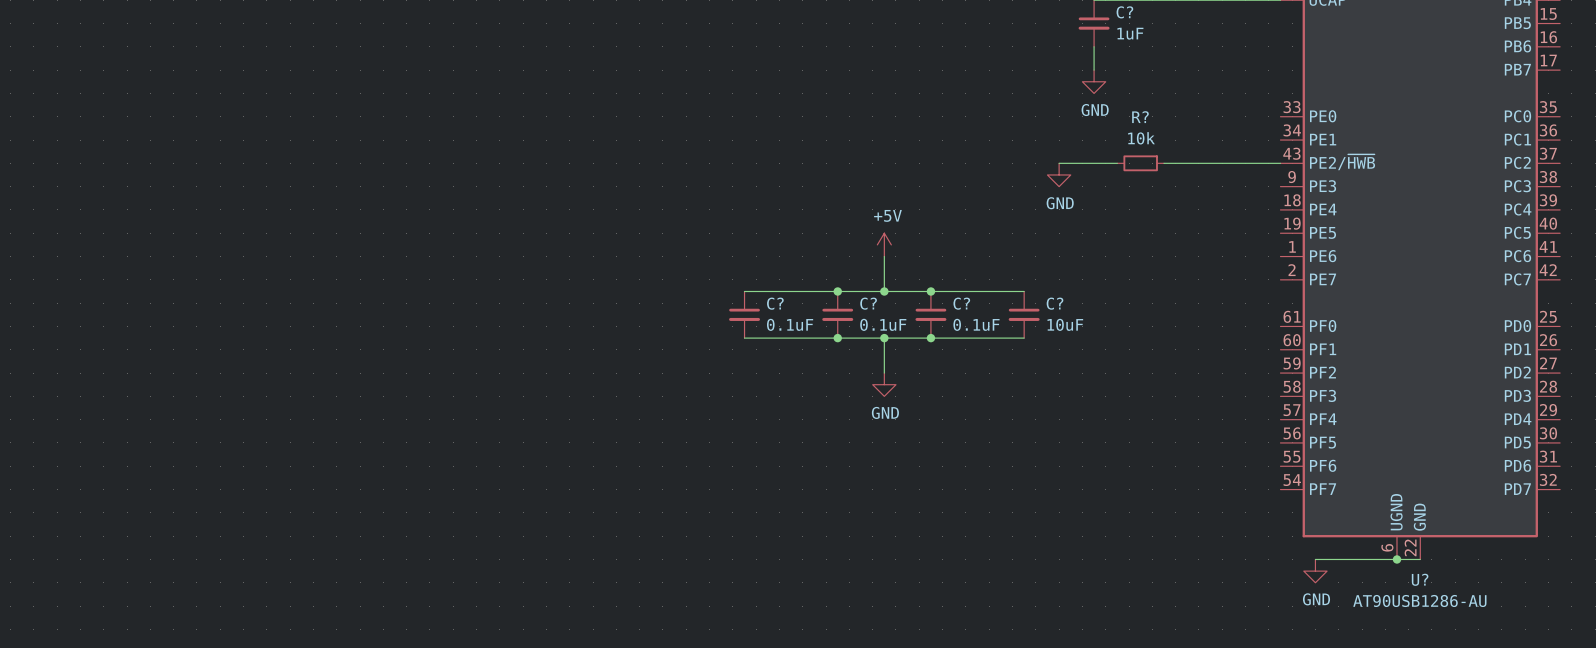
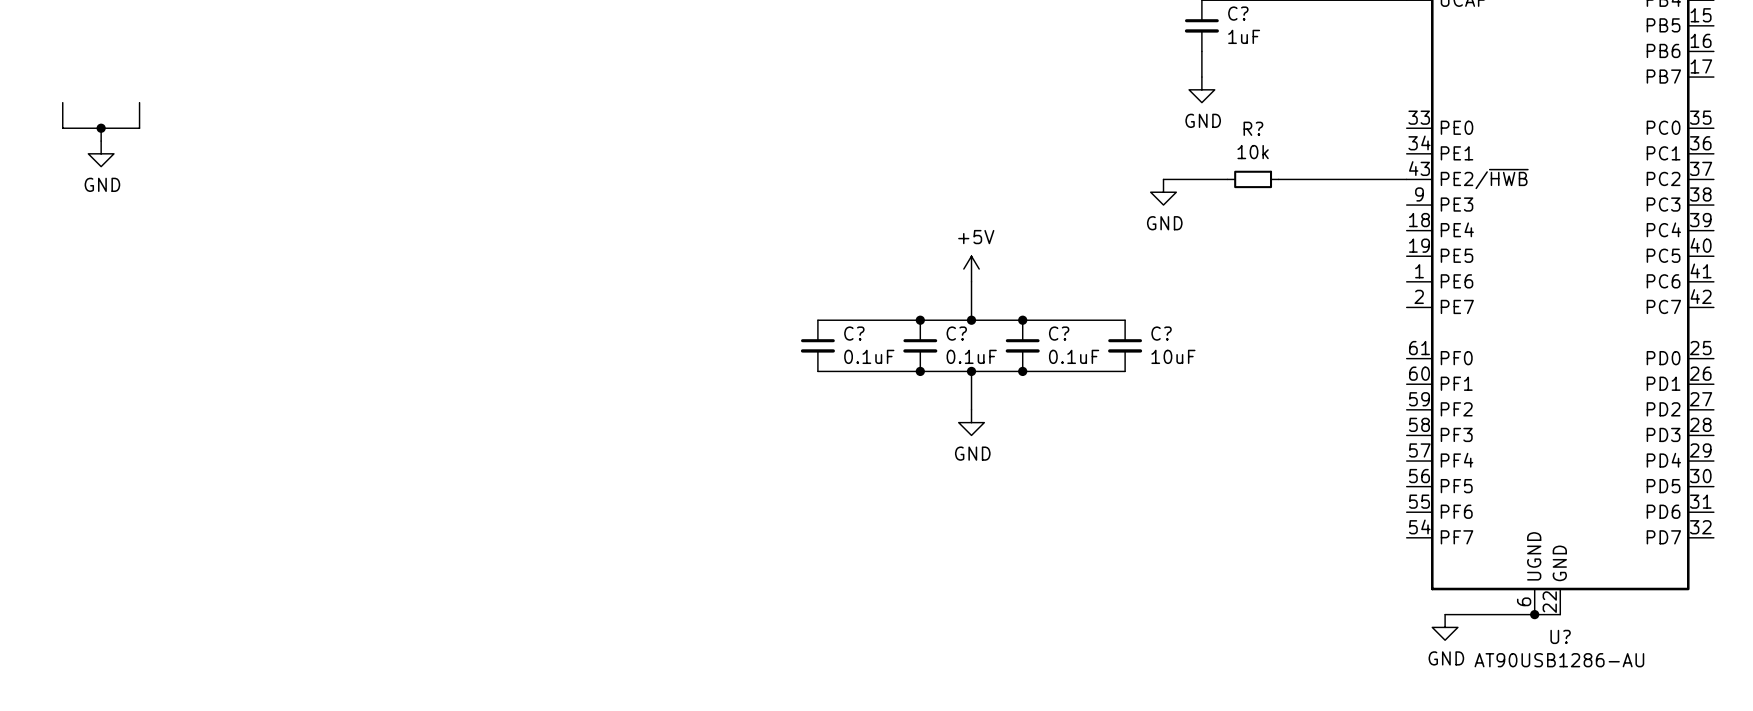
wire: none -> (62, 102) (62, 128) (139, 128) (139, 102)
wire: none -> (101, 128) (101, 141)
junction: none -> (101, 128)
power symbol: none -> GND (101, 153)

